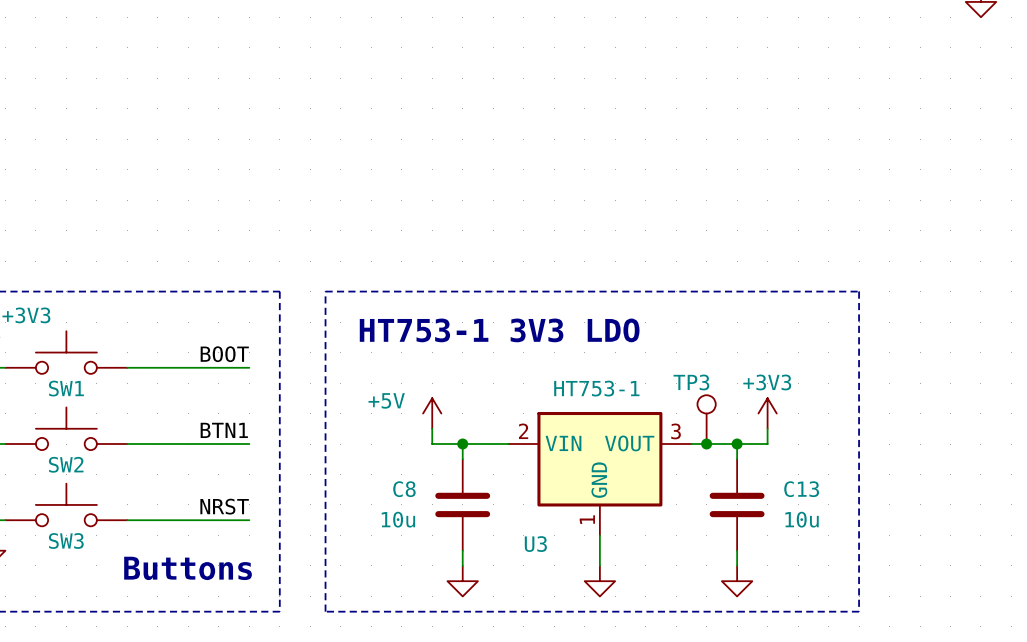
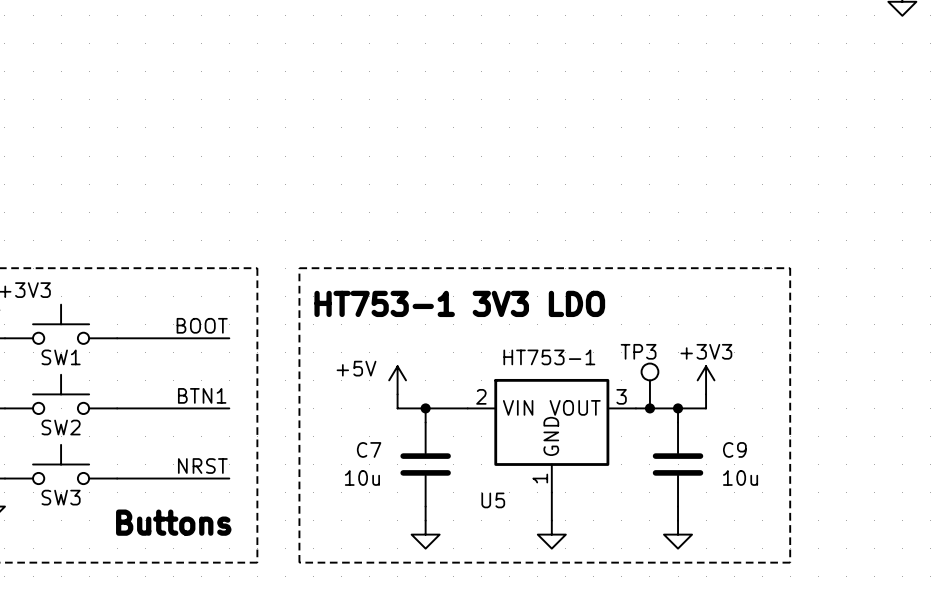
C8 name: C8 (404, 489) -> C7 (369, 449)
C13 name: C13 (801, 489) -> C9 (734, 449)
U3 name: U3 (535, 544) -> U5 (493, 500)

